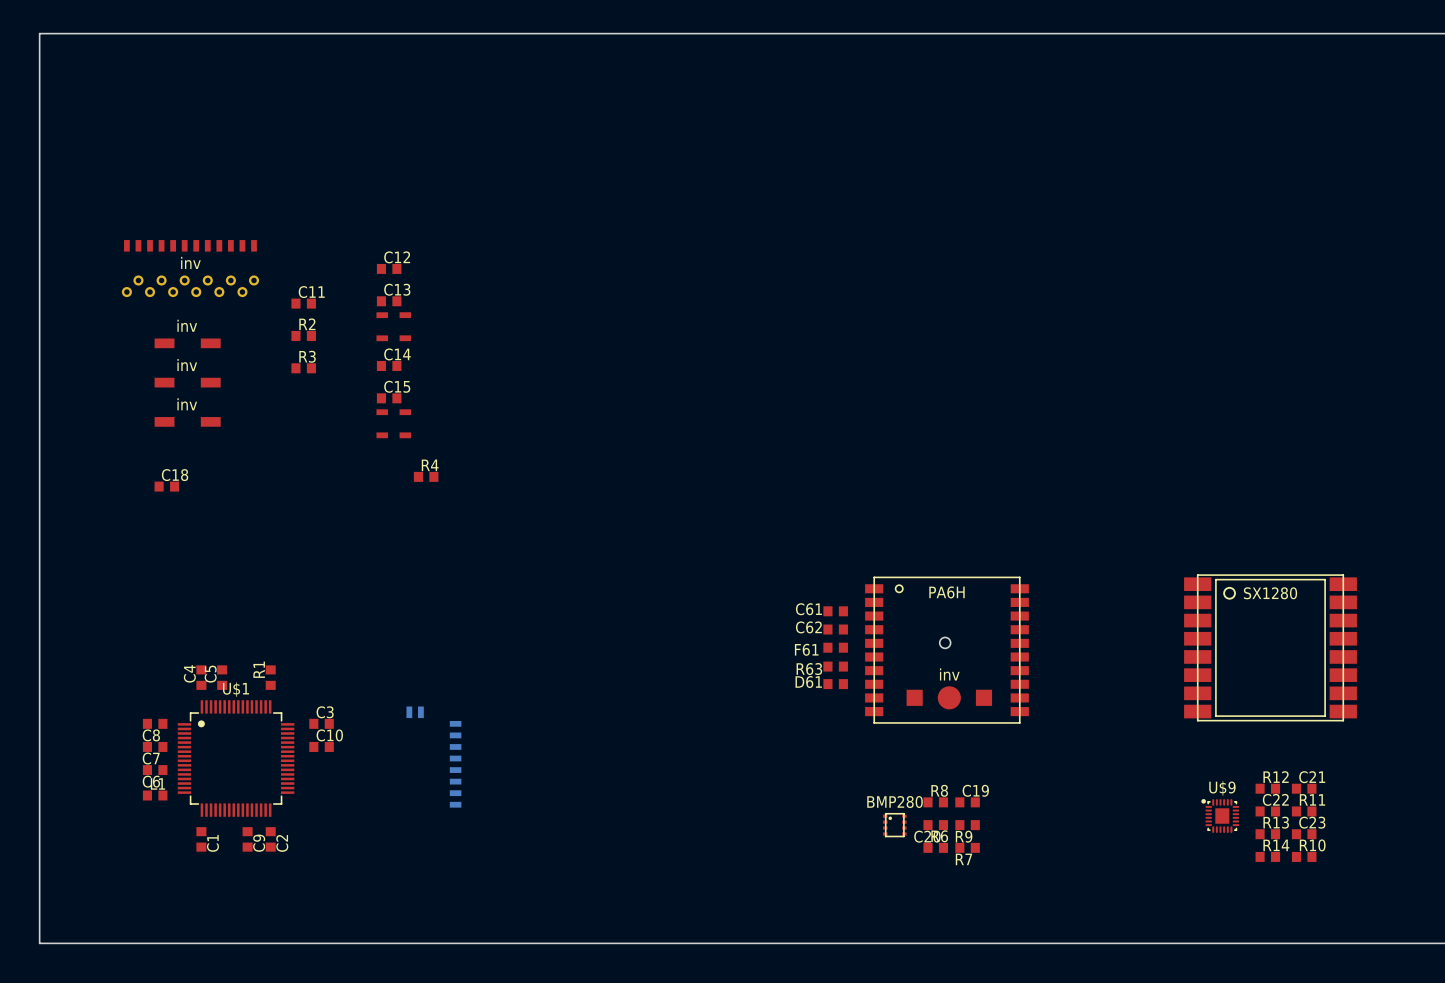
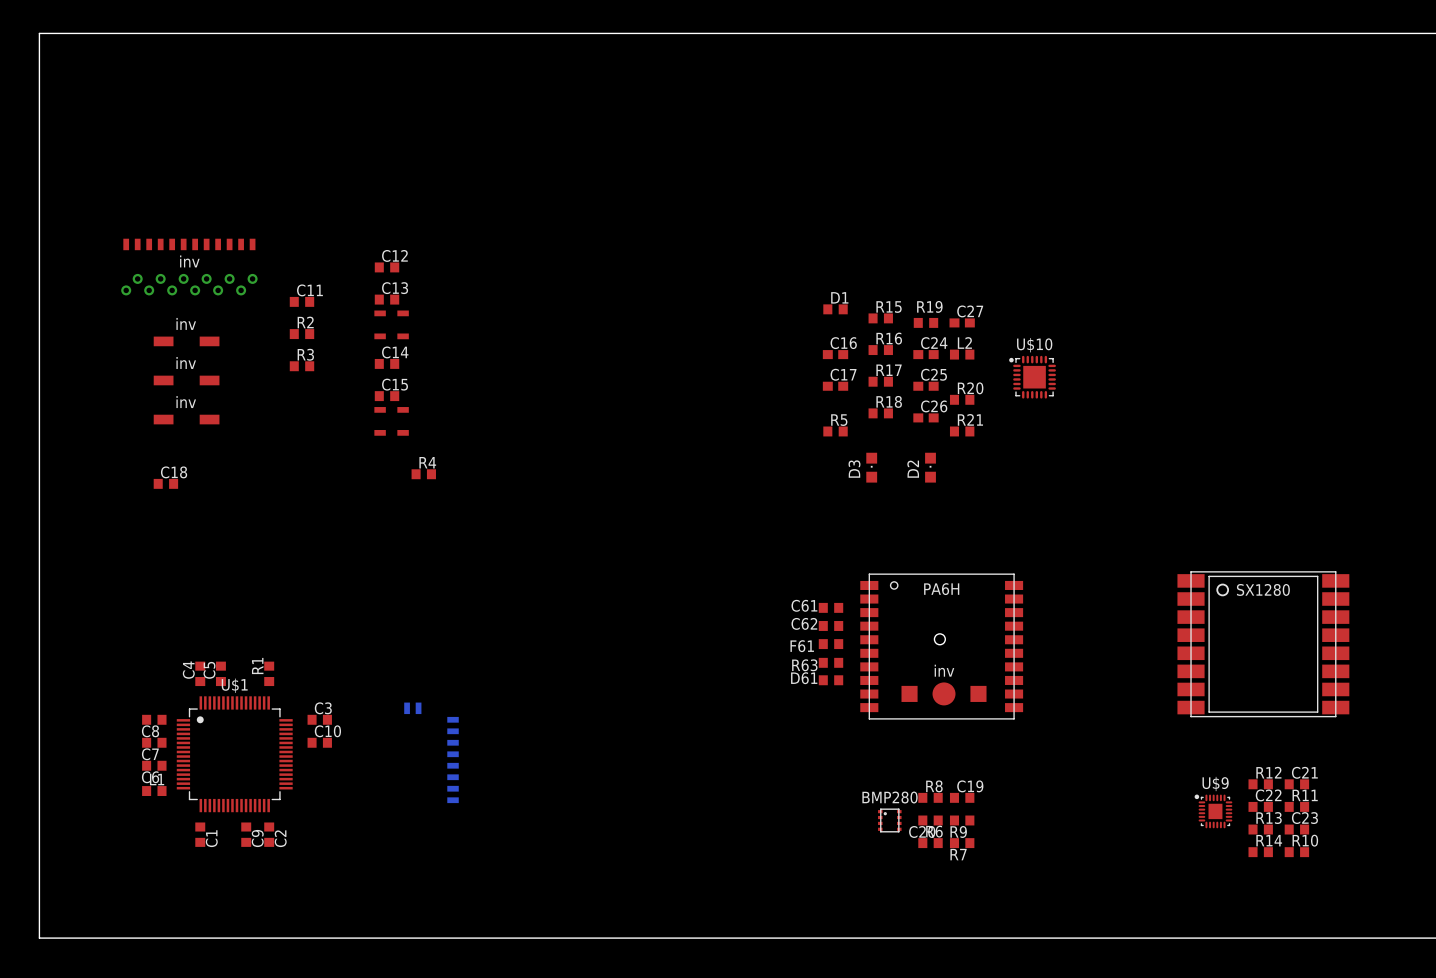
D1: none -> (835, 309)
R15: none -> (880, 318)
R19: none -> (925, 322)
C27: none -> (962, 322)
R16: none -> (880, 350)
C16: none -> (835, 354)
C24: none -> (925, 354)
L2: none -> (962, 354)
U$10: none -> (1032, 377)
R17: none -> (880, 381)
C17: none -> (835, 386)
C25: none -> (925, 386)
R20: none -> (962, 399)
R18: none -> (880, 413)
C26: none -> (925, 417)
R5: none -> (835, 431)
R21: none -> (962, 431)
D3: none -> (871, 467)
D2: none -> (930, 467)

